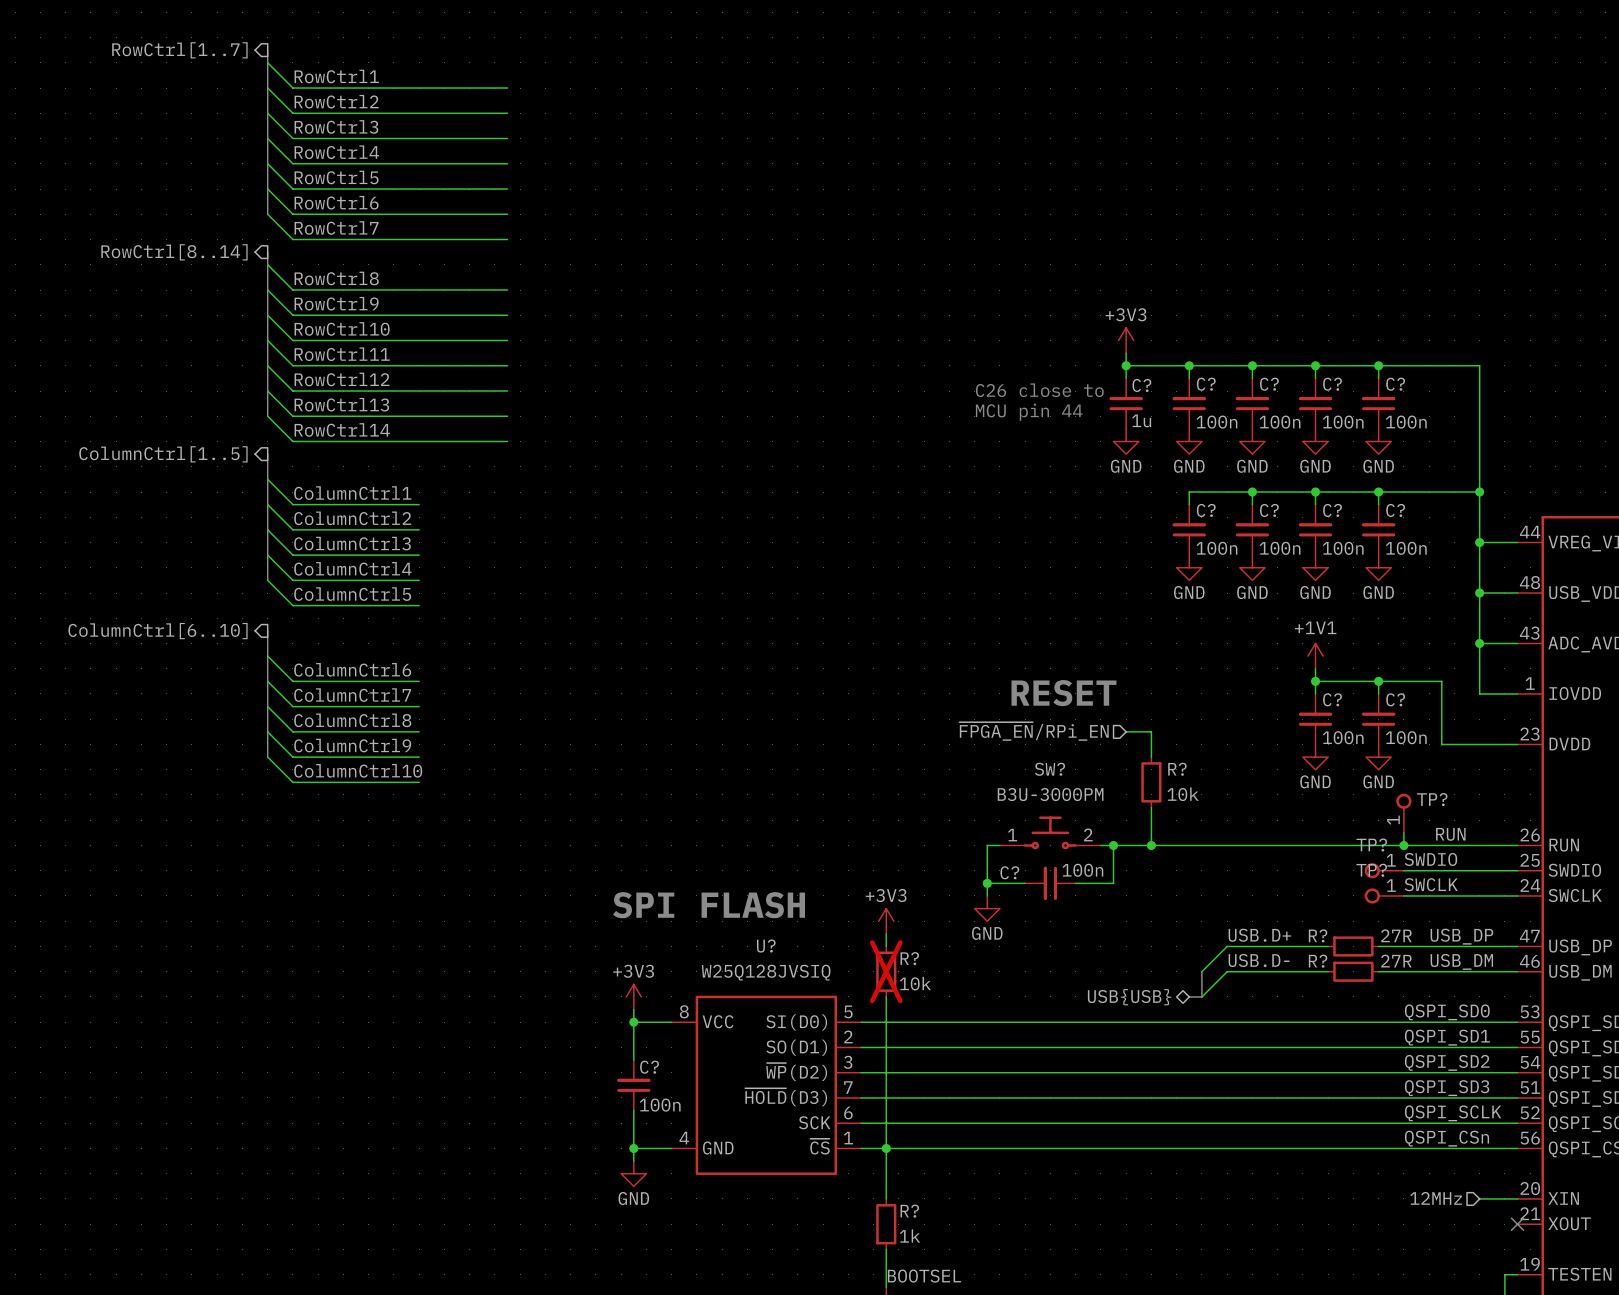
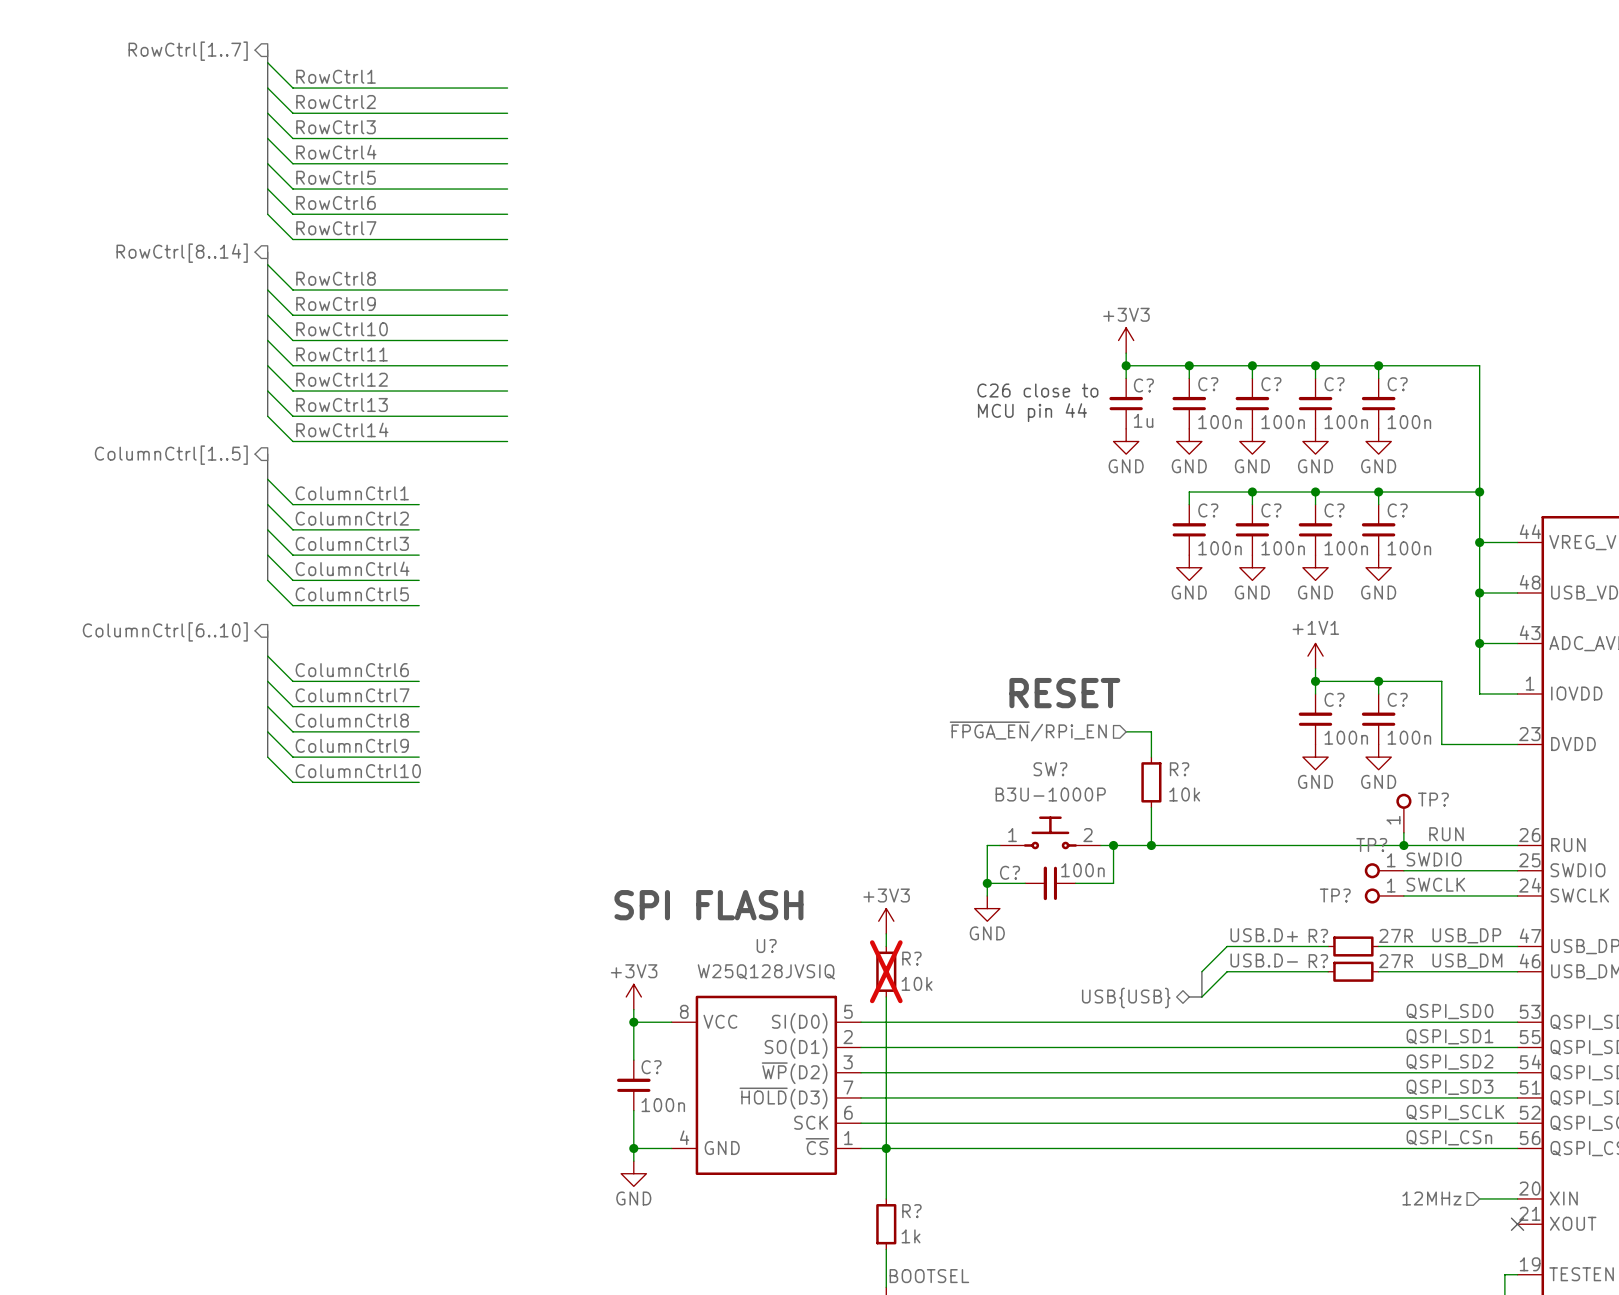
SW? text: B3U-3000PM (1050, 794) -> B3U-1000P (1050, 794)
TP? name position: TP? (1371, 870) -> TP? (1335, 895)

